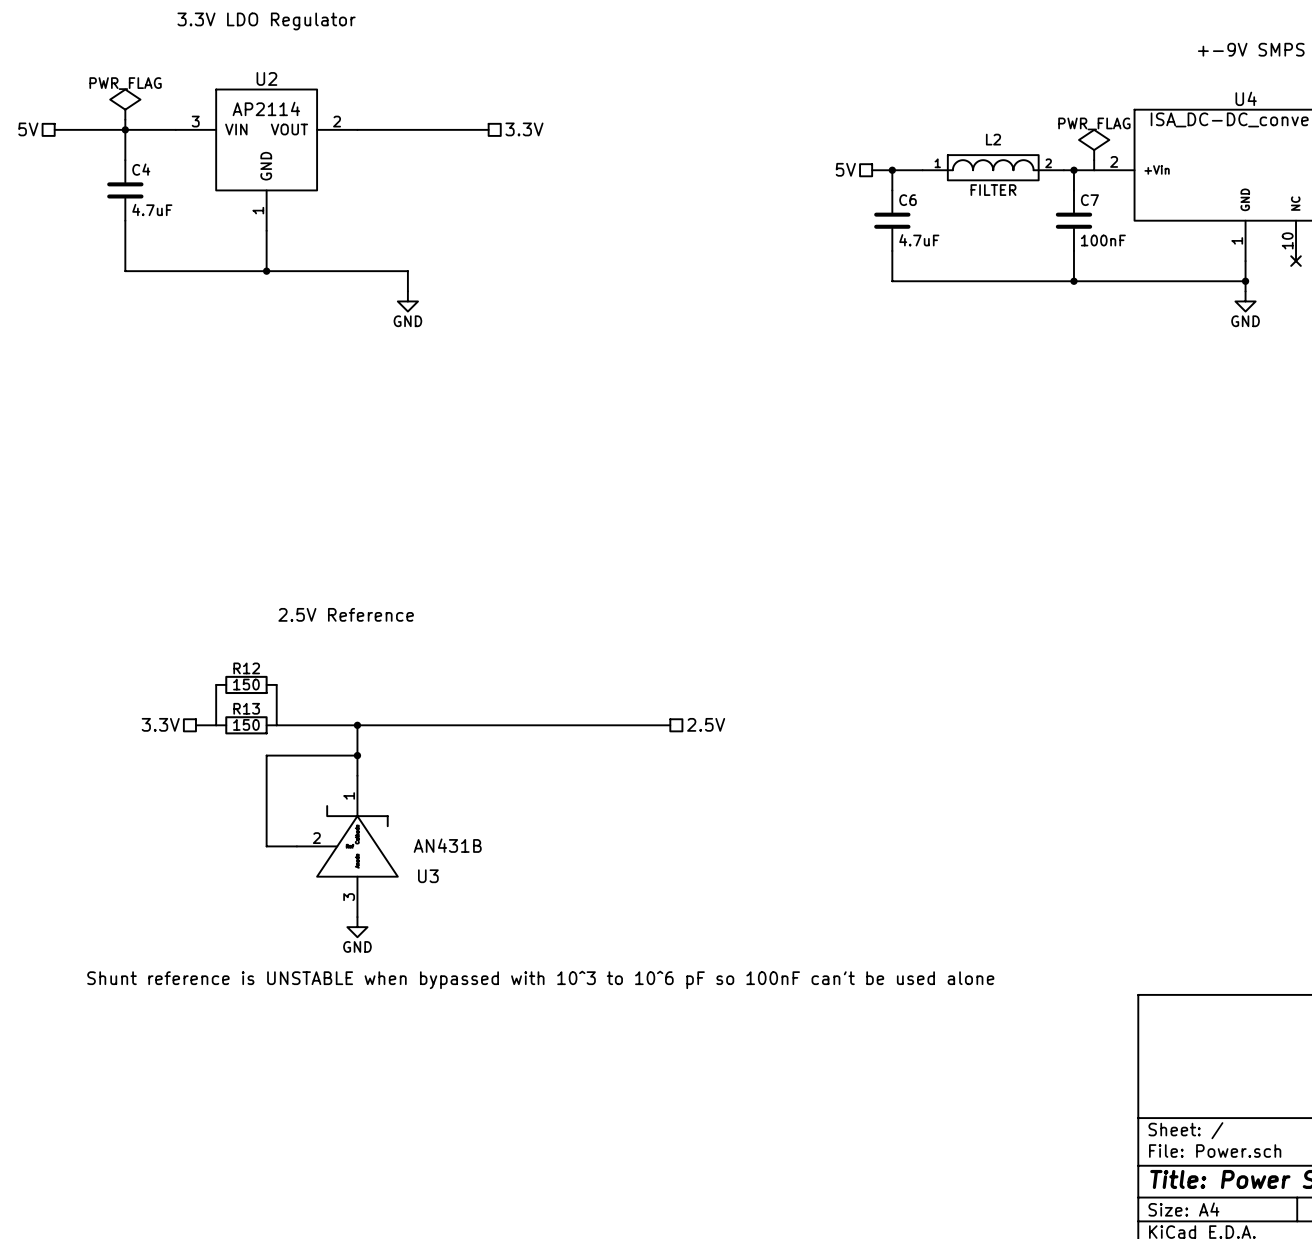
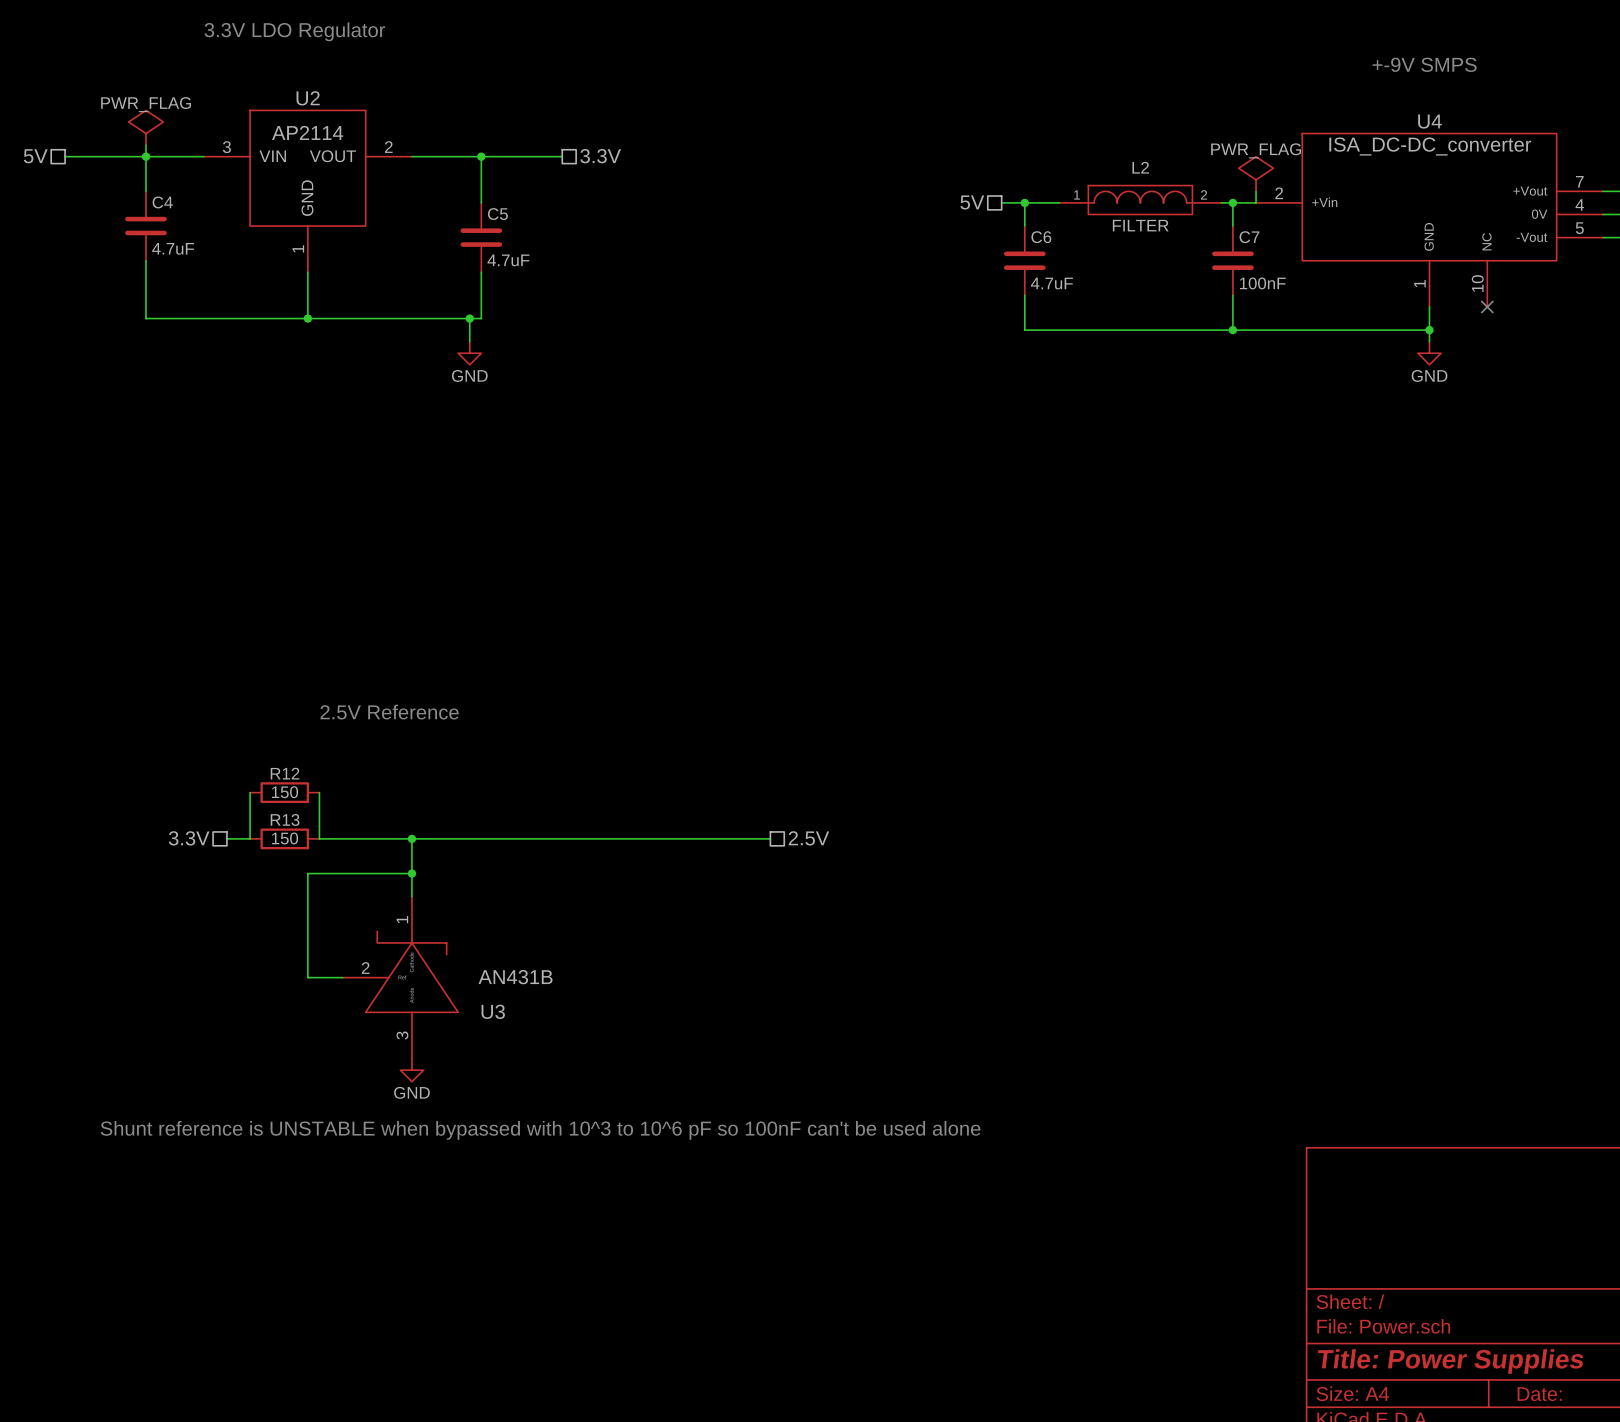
wire: none -> (481, 156) (481, 202)
junction: none -> (481, 156)
C5: none -> 4.7uF (481, 237)
wire: none -> (481, 272) (481, 318) (469, 318)
junction: none -> (469, 318)

